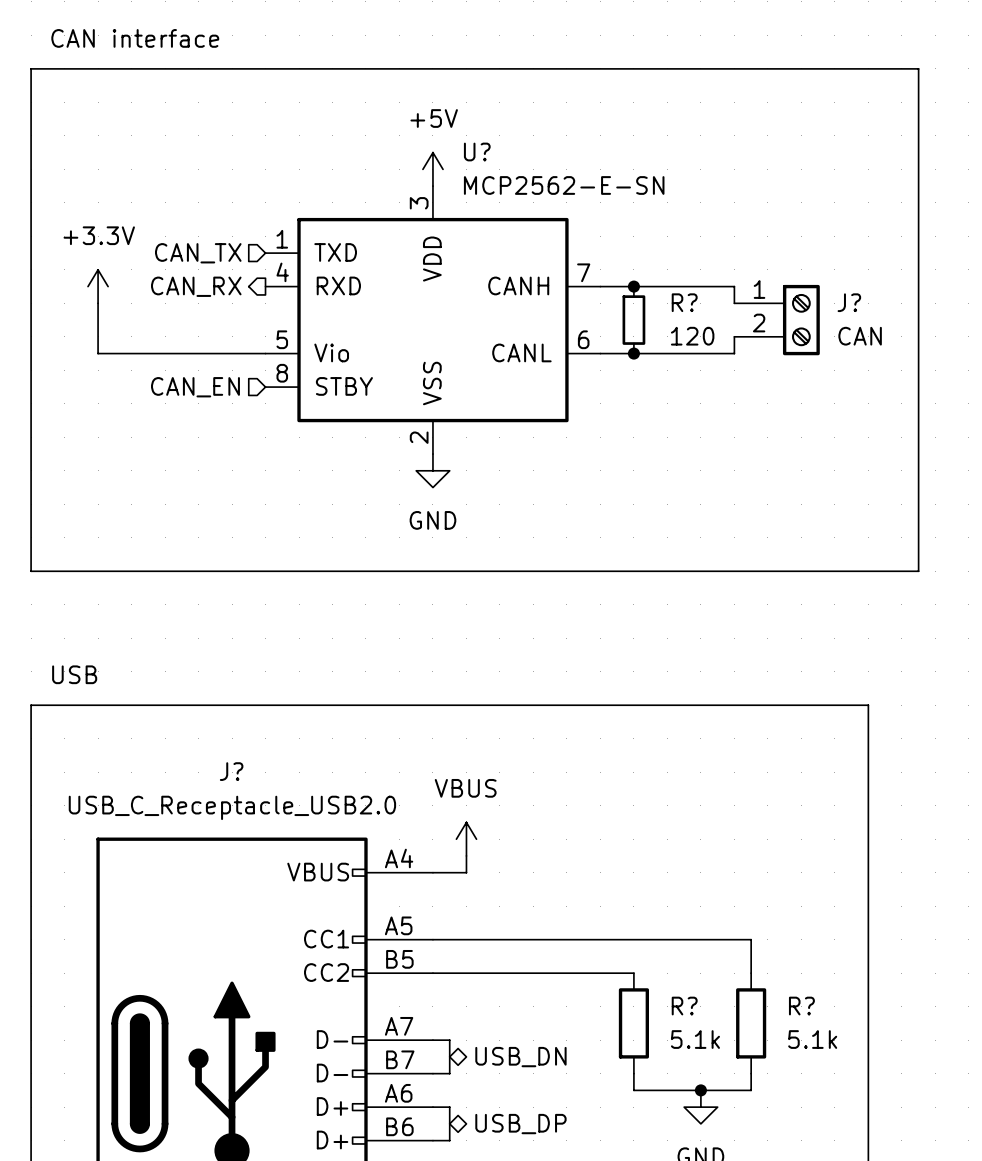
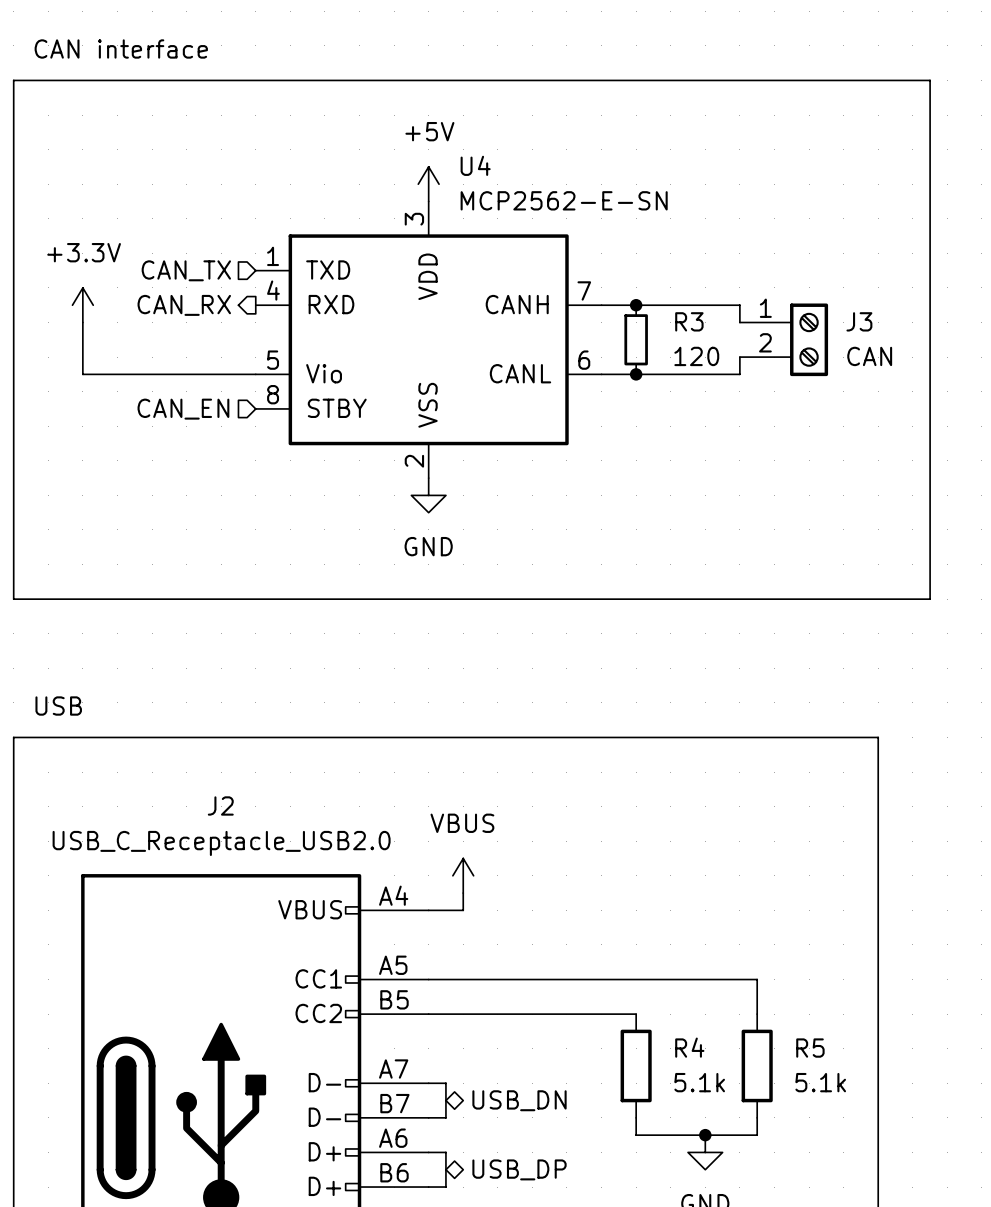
U? name: U? (477, 152) -> U4 (475, 165)
R? name: R? (684, 302) -> R3 (689, 321)
J? name: J? (849, 302) -> J3 (859, 321)
J? name: J? (231, 771) -> J2 (220, 805)
R? name: R? (684, 1006) -> R4 (689, 1047)
R? name: R? (801, 1006) -> R5 (810, 1048)

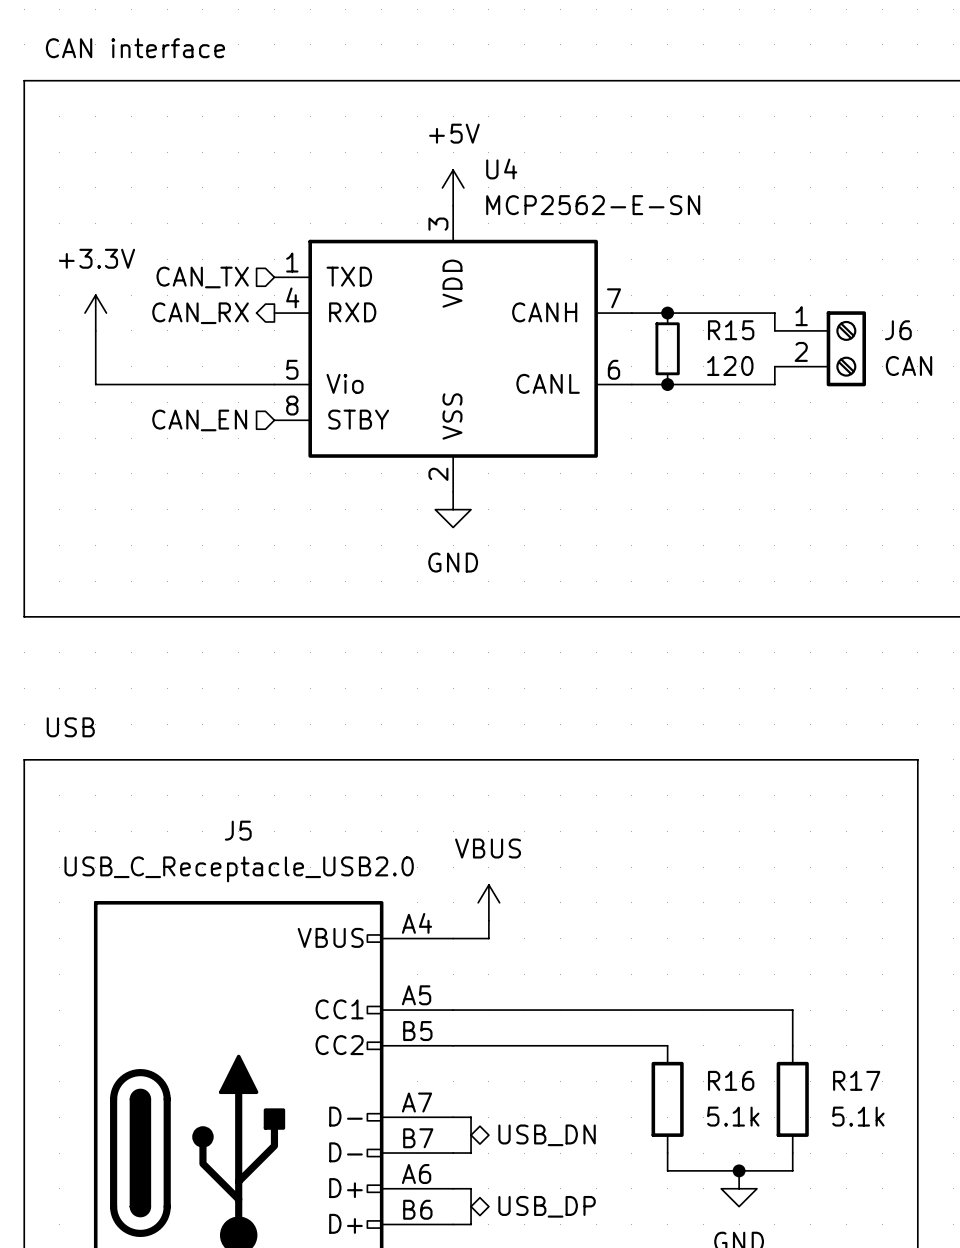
R3 name: R3 (689, 321) -> R15 (731, 330)
J3 name: J3 (859, 321) -> J6 (898, 330)
J2 name: J2 (220, 805) -> J5 (238, 830)
R4 name: R4 (689, 1047) -> R16 (731, 1080)
R5 name: R5 (810, 1048) -> R17 (856, 1080)

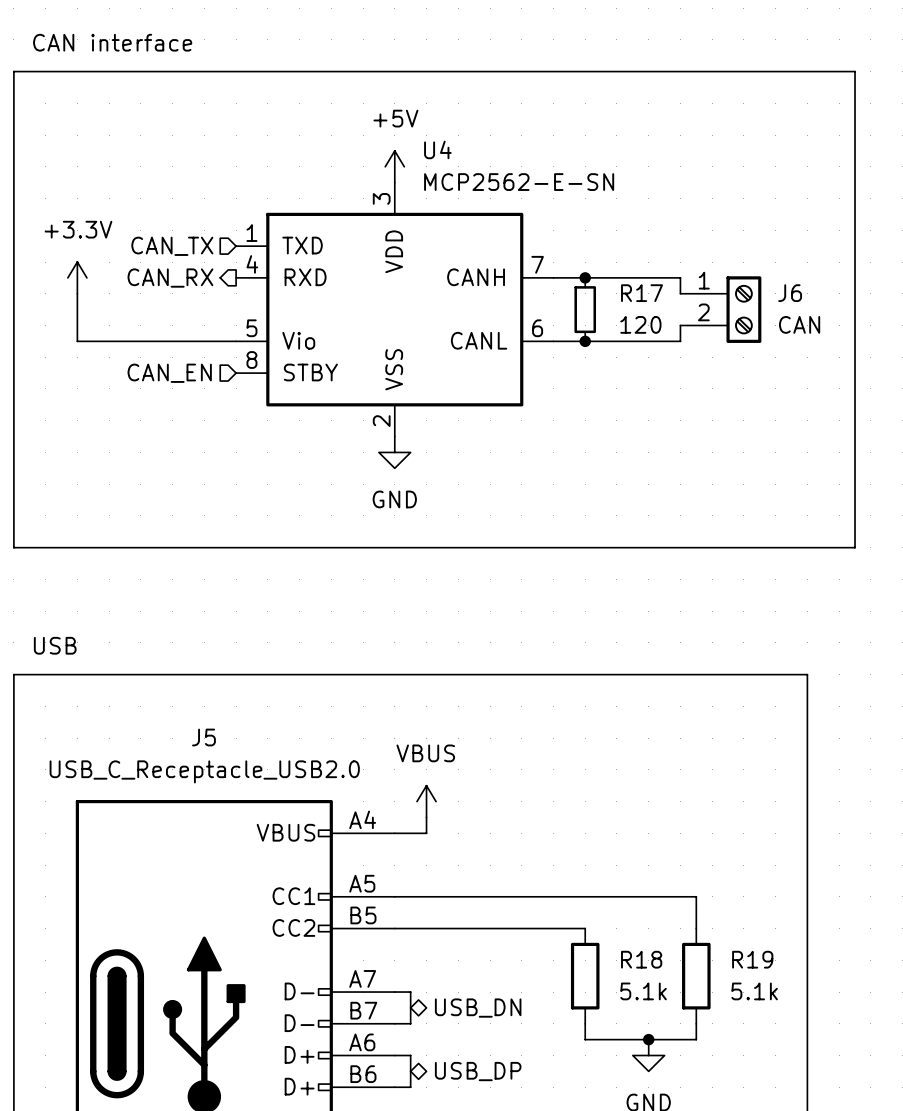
R15 name: R15 (731, 330) -> R17 (642, 293)
R16 name: R16 (731, 1080) -> R18 (641, 959)
R17 name: R17 (856, 1080) -> R19 (752, 959)

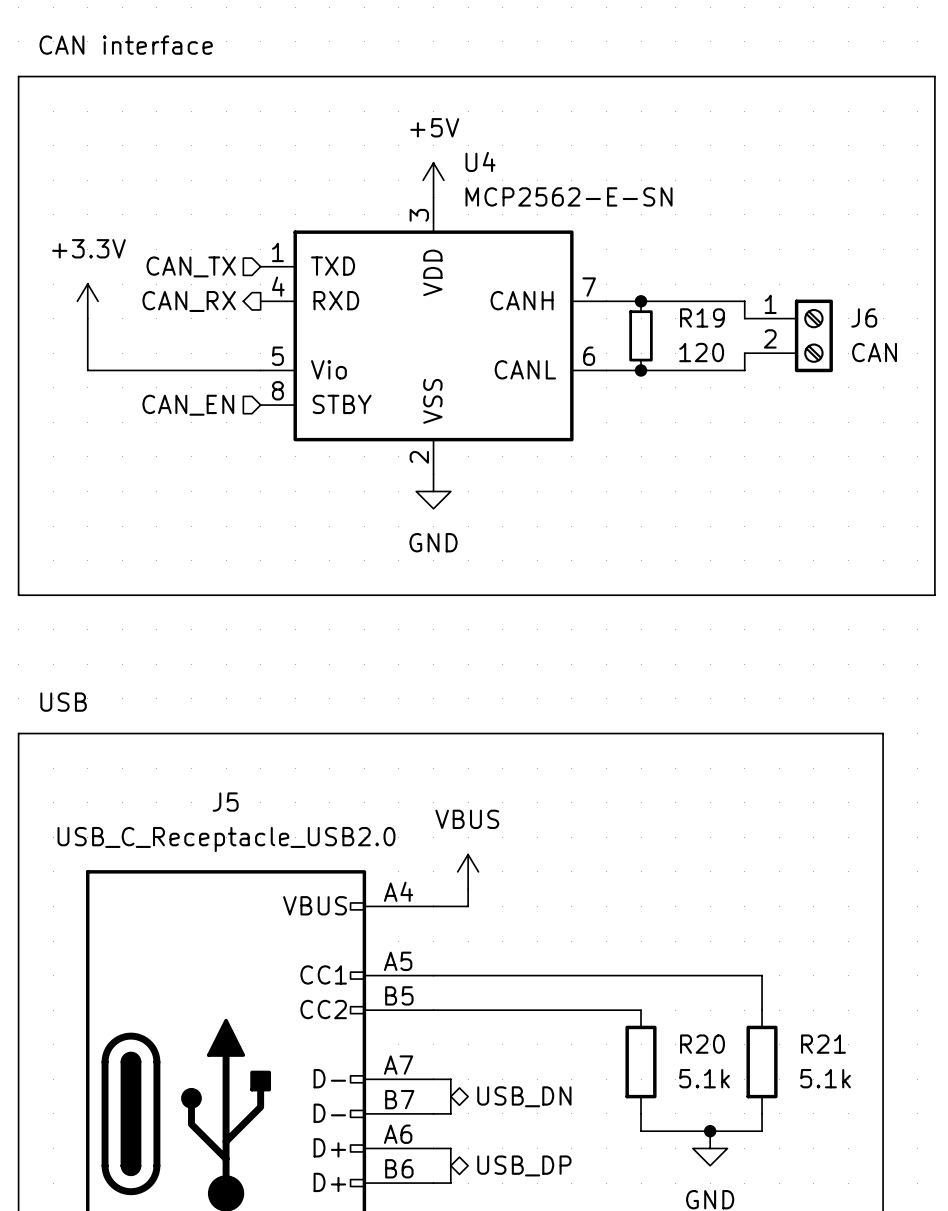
R17 name: R17 (642, 293) -> R19 (702, 317)
R18 name: R18 (641, 959) -> R20 (702, 1044)
R19 name: R19 (752, 959) -> R21 (823, 1044)

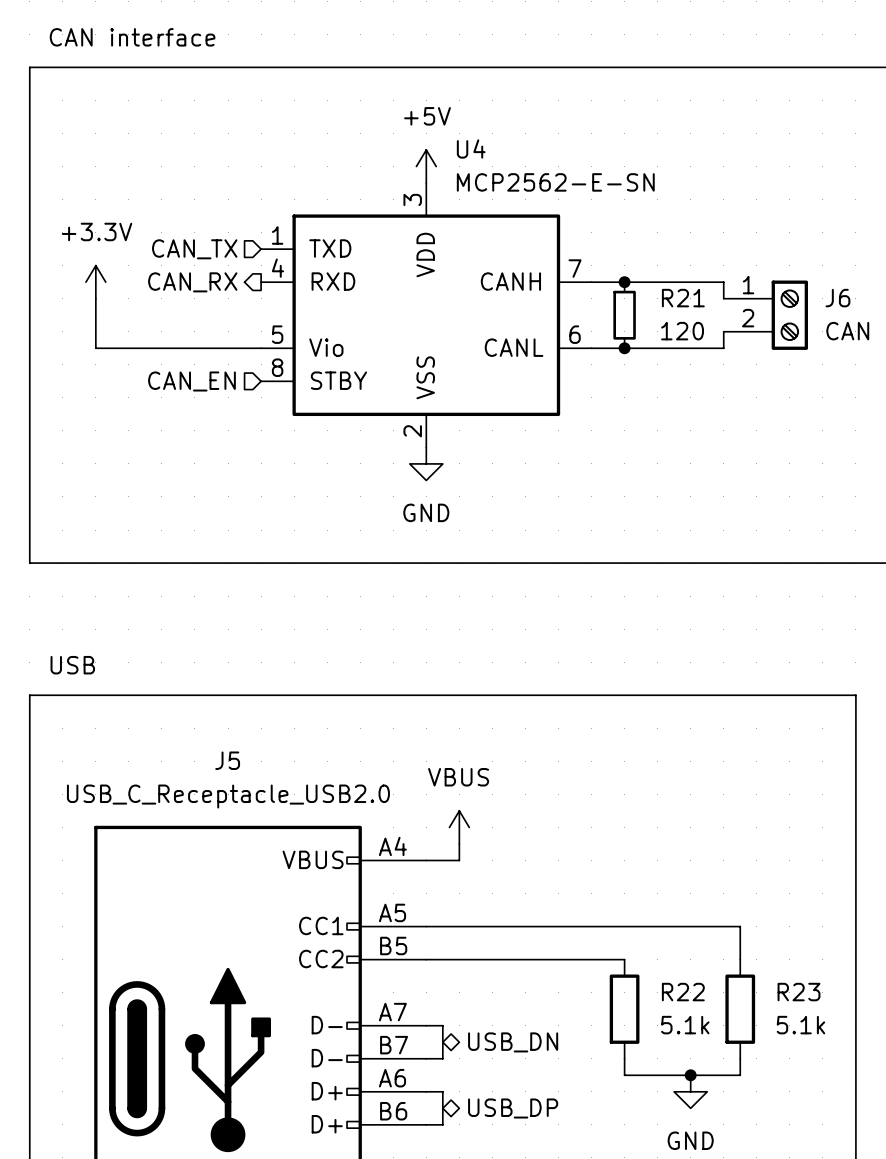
R19 name: R19 (702, 317) -> R21 (683, 298)
R20 name: R20 (702, 1044) -> R22 (683, 992)
R21 name: R21 (823, 1044) -> R23 (799, 992)

